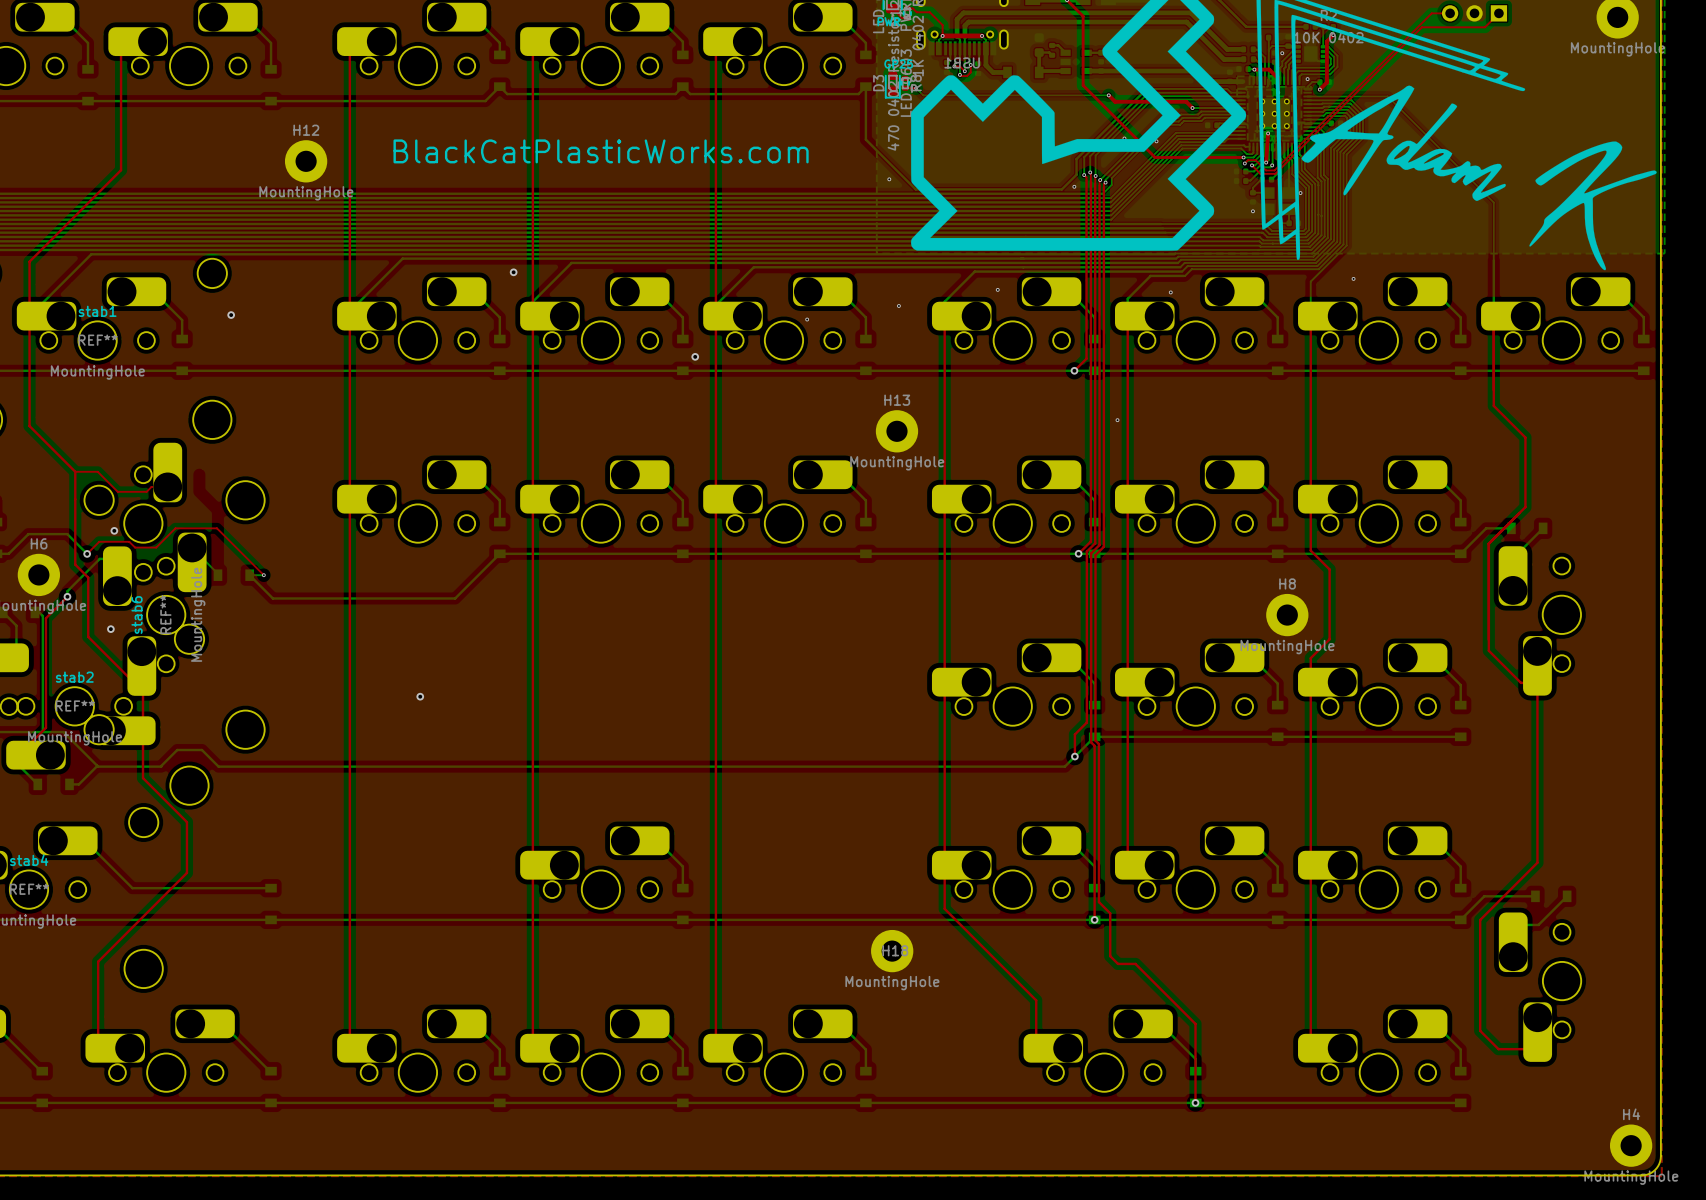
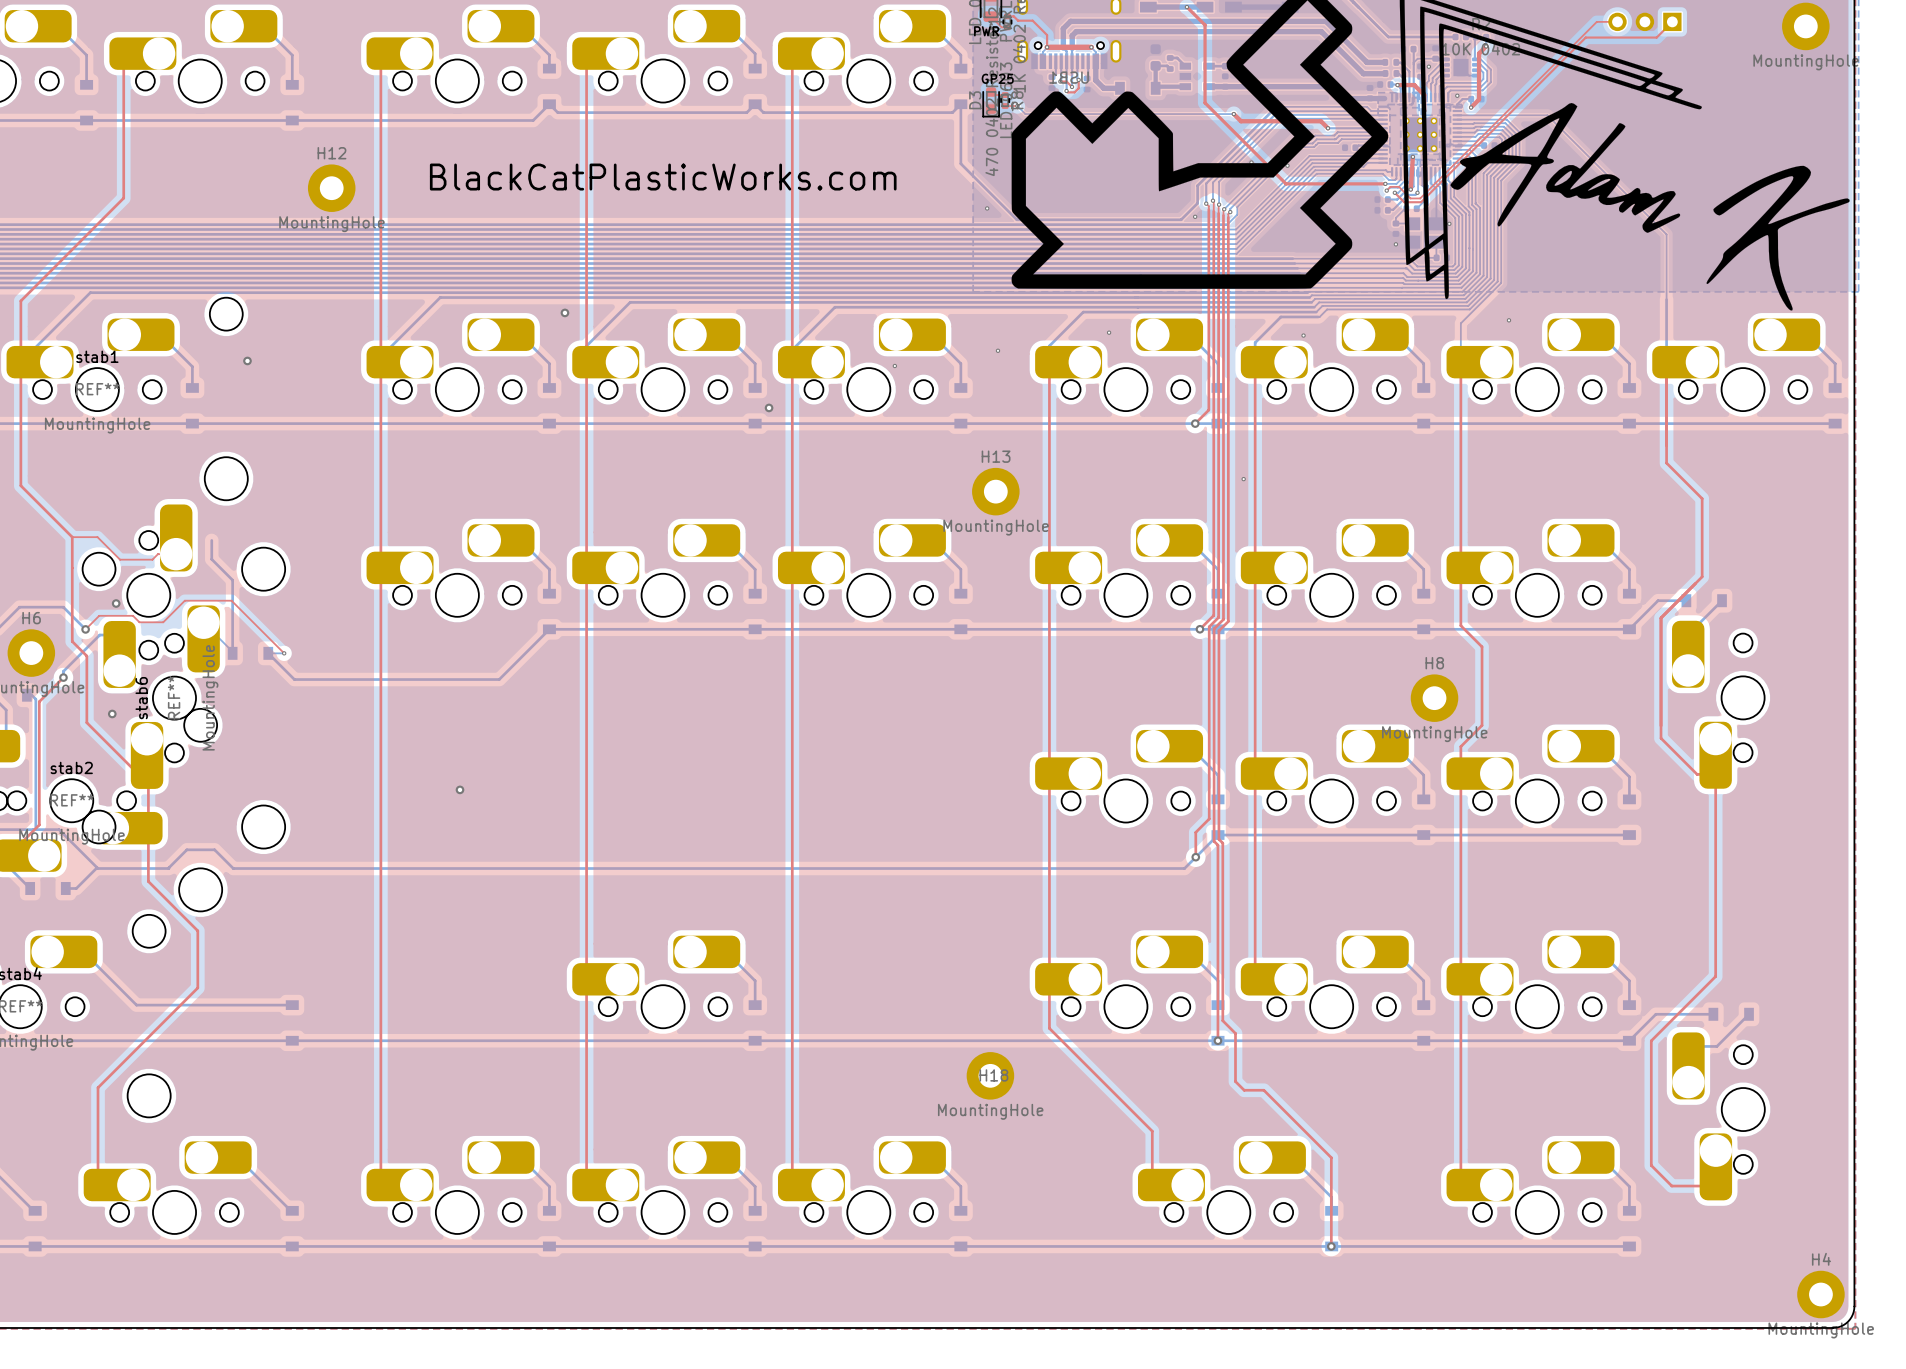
bottom track: none -> (211, 540) (211, 559) (232, 580) (232, 653)

